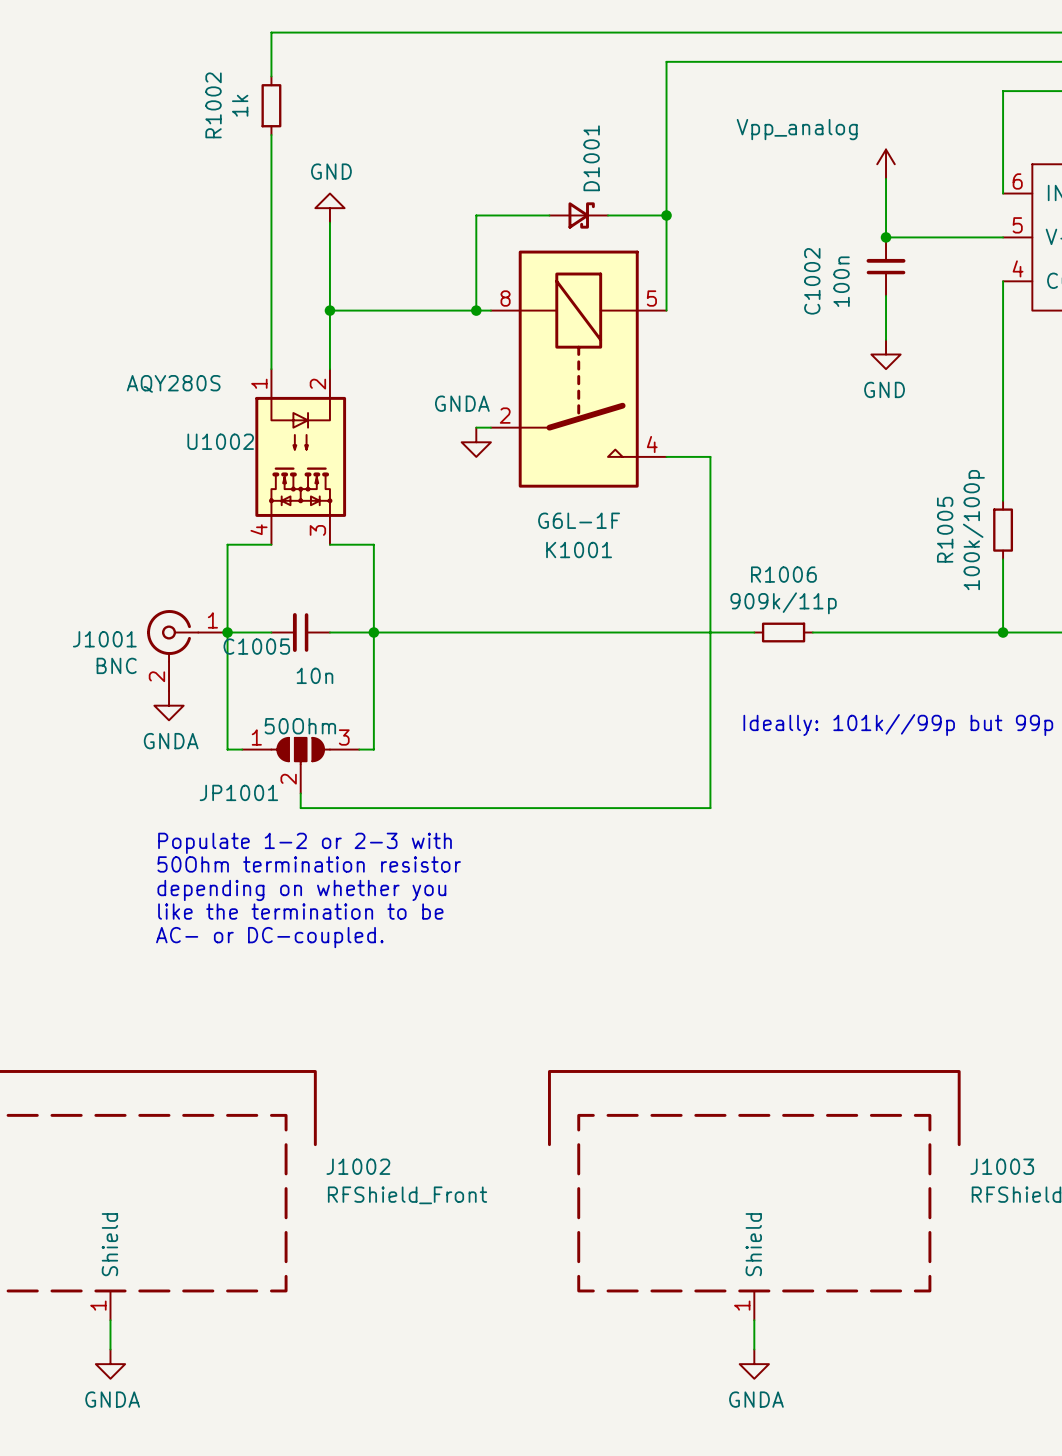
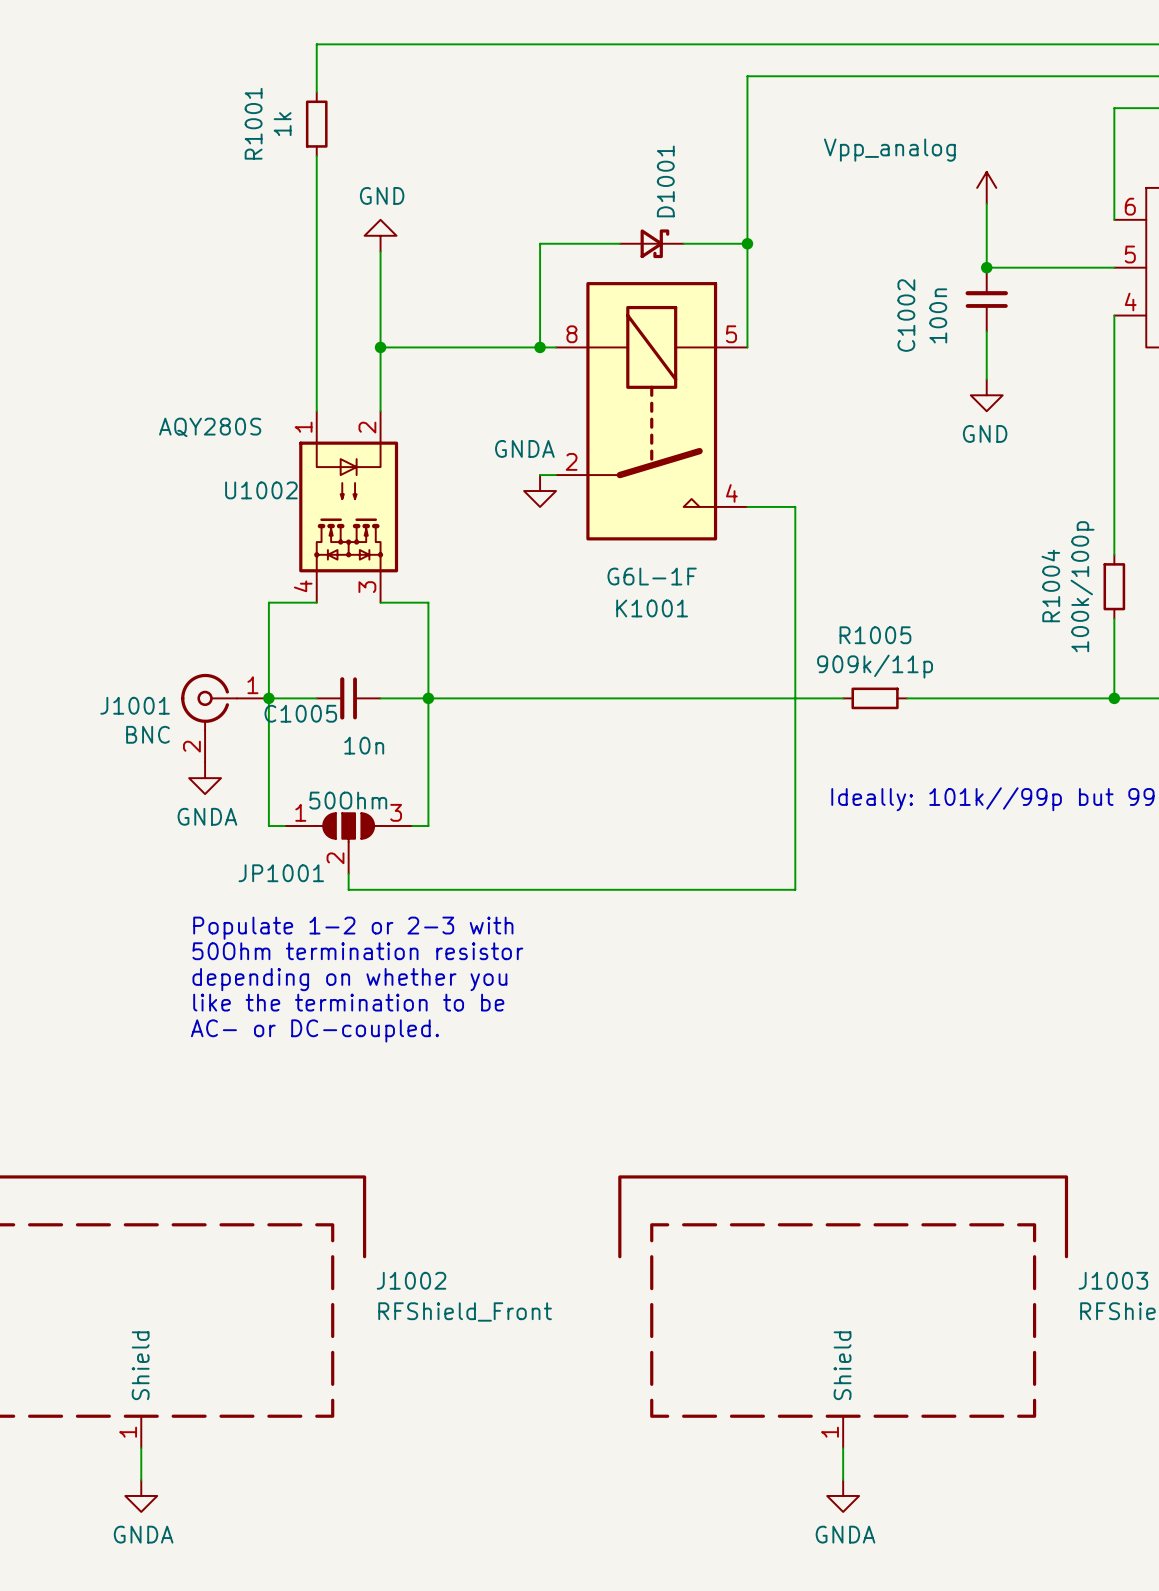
R1002 name: R1002 (213, 105) -> R1001 (253, 123)
R1005 name: R1005 (945, 529) -> R1004 (1050, 585)
R1006 name: R1006 (783, 574) -> R1005 (875, 635)

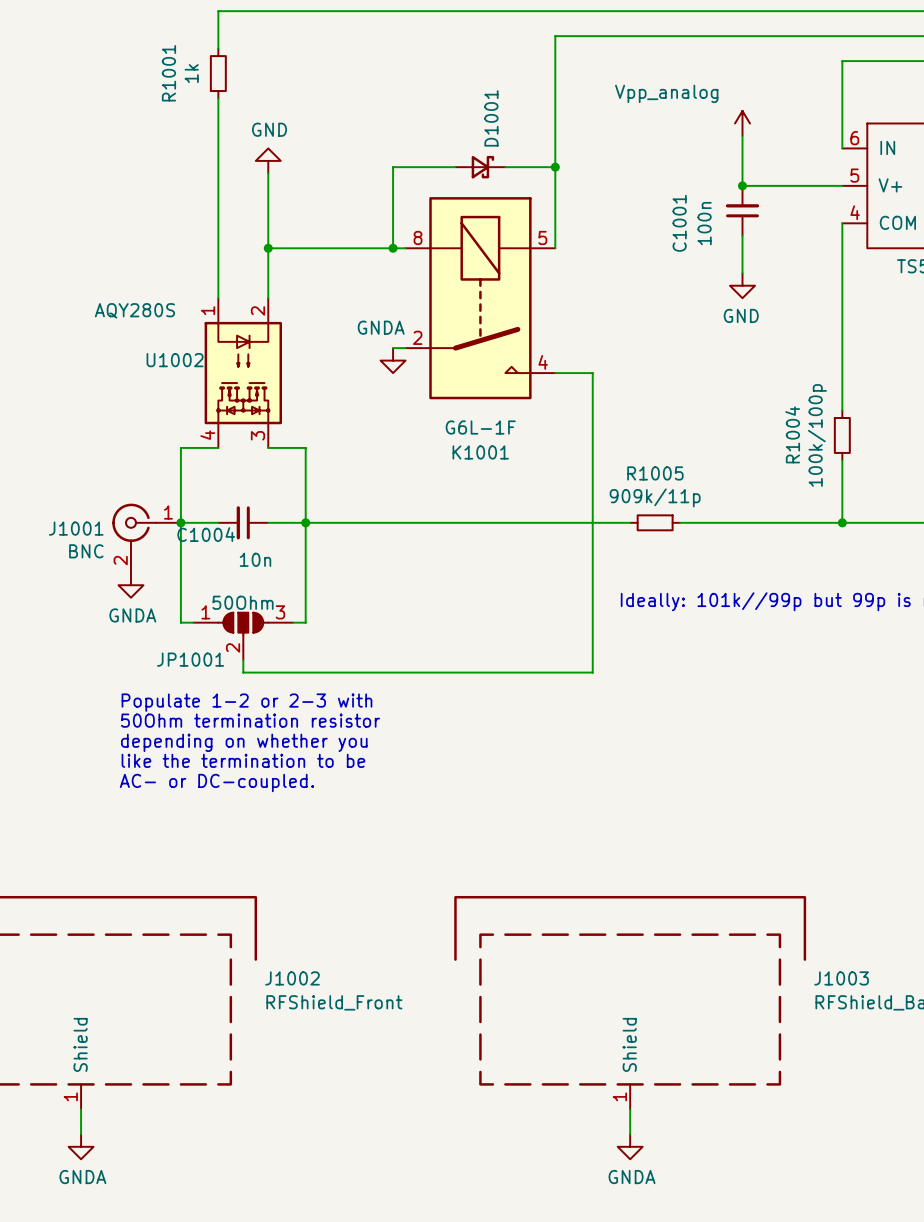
C1002 name: C1002 (906, 315) -> C1001 (679, 223)
C1005 name: C1005 (300, 713) -> C1004 (206, 534)

